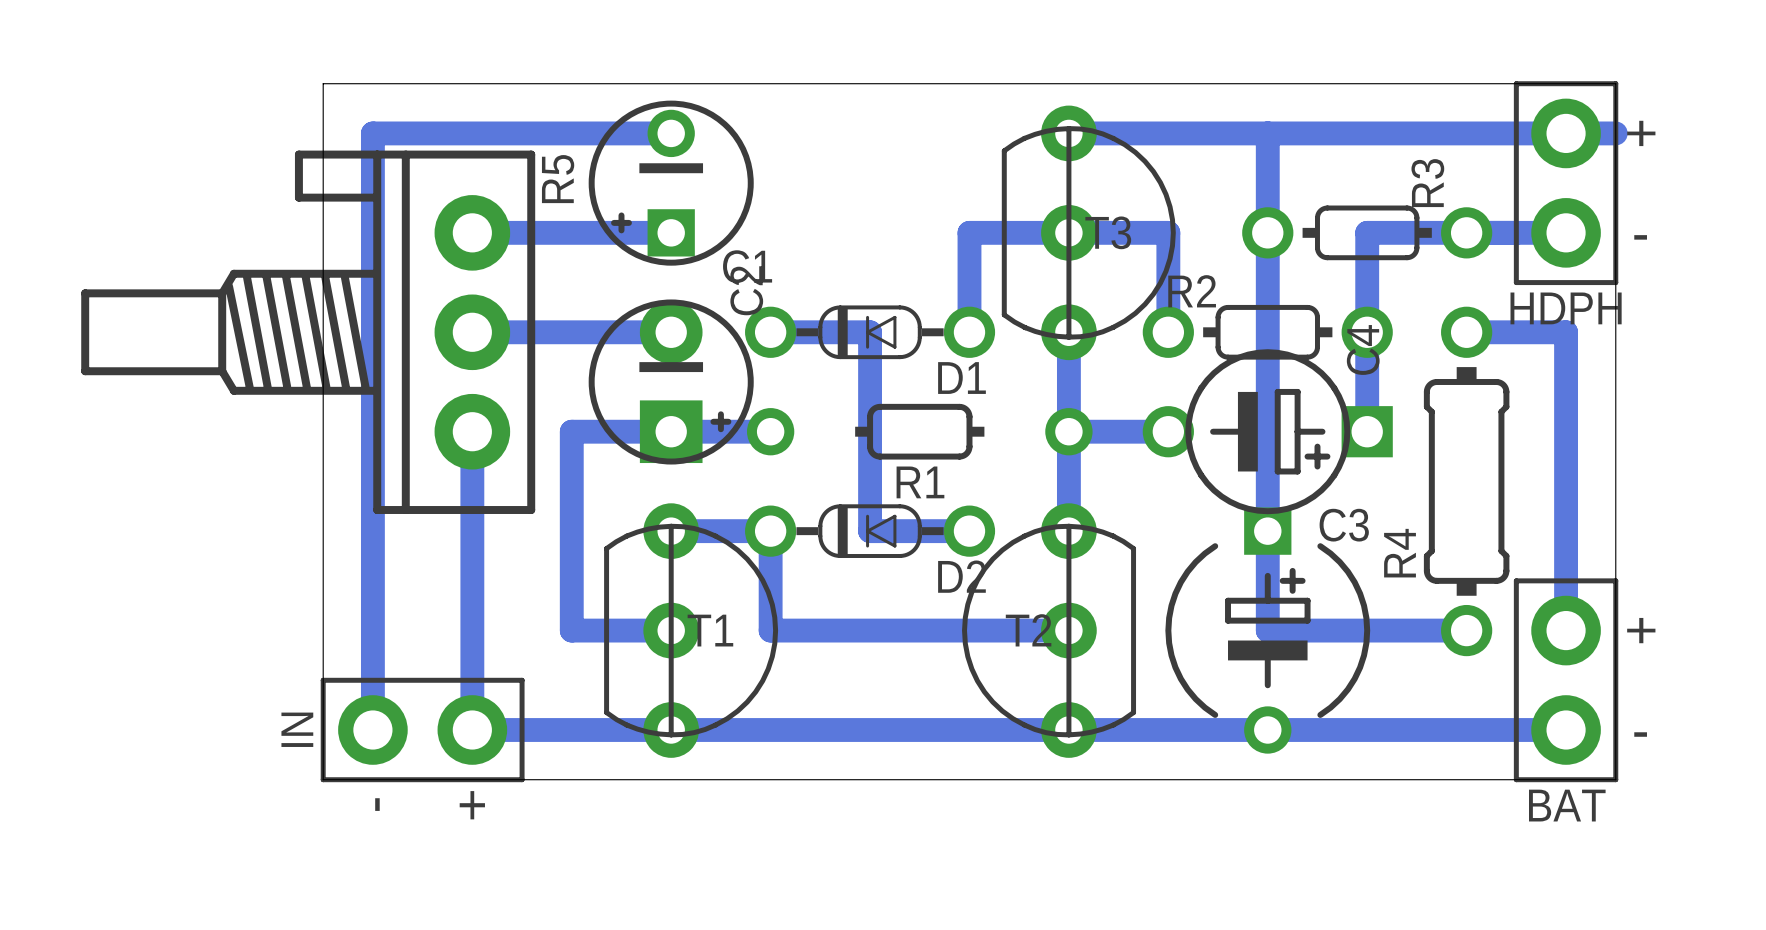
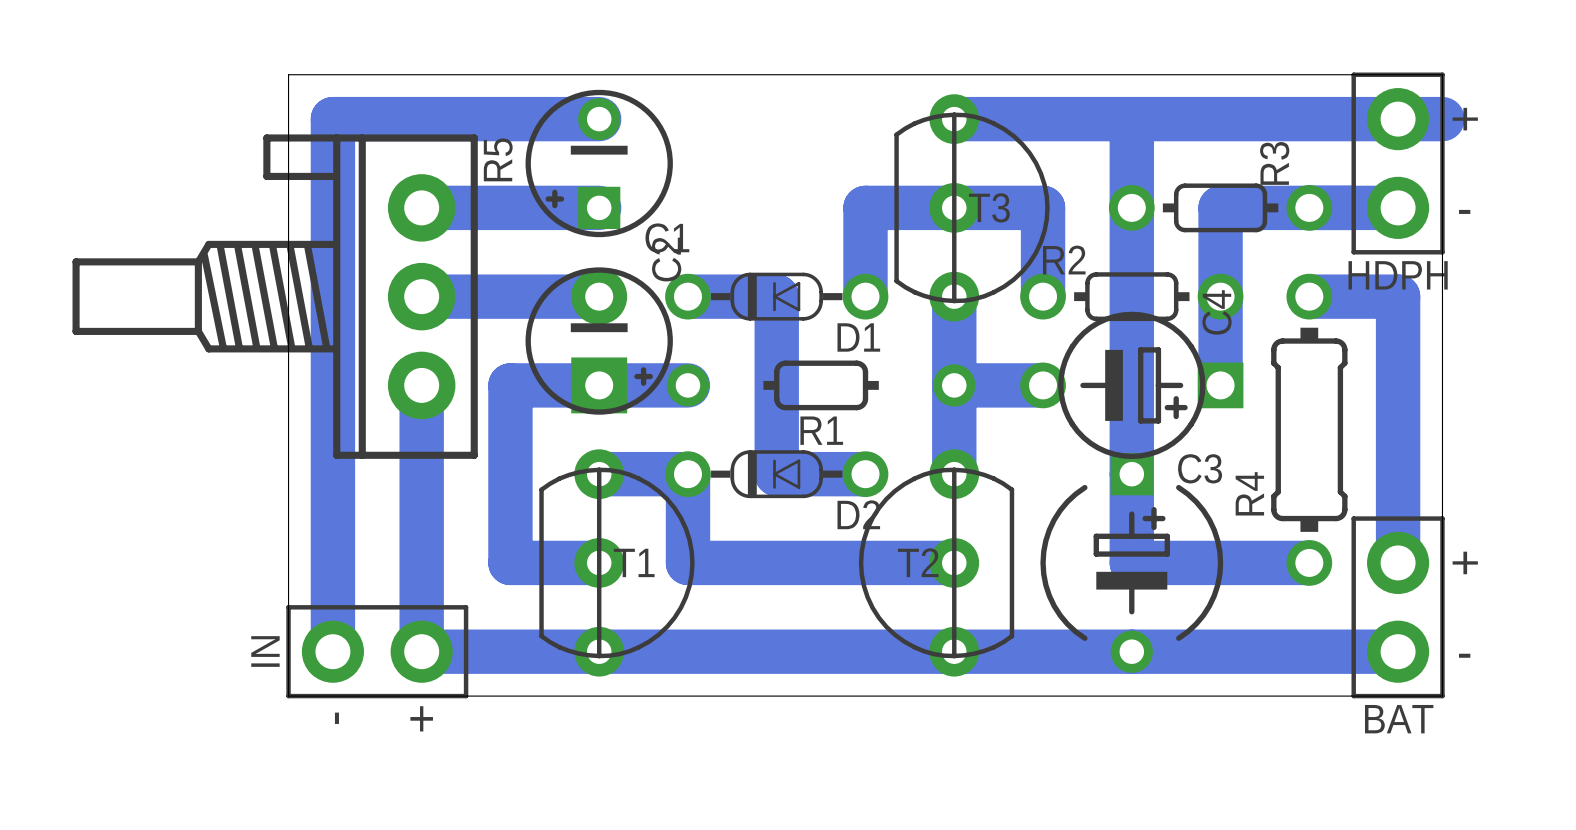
bottom track width: thin (671, 133) (372, 133) (372, 730) -> thick (599, 119) (332, 119) (332, 651)
bottom track width: thin (1068, 133) (1615, 133) -> thick (954, 119) (1442, 119)
bottom track width: thin (1267, 133) (1267, 630) (1466, 630) -> thick (1131, 119) (1131, 562) (1309, 562)
bottom track width: thin (472, 232) (671, 232) -> thick (421, 207) (599, 207)
bottom track width: thin (1566, 232) (1367, 232) (1367, 431) -> thick (1398, 207) (1220, 207) (1220, 385)
bottom track width: thin (472, 332) (671, 332) -> thick (421, 296) (599, 296)
bottom track width: thin (770, 332) (870, 332) (870, 531) (969, 531) -> thick (687, 296) (776, 296) (776, 474) (865, 474)
bottom track width: thin (969, 332) (969, 232) (1168, 232) (1168, 332) -> thick (865, 296) (865, 207) (1043, 207) (1043, 296)
bottom track width: thin (1068, 332) (1068, 531) -> thick (954, 296) (954, 474)
bottom track width: thin (1466, 332) (1566, 332) (1566, 630) -> thick (1309, 296) (1398, 296) (1398, 562)
bottom track width: thin (472, 431) (472, 730) (1566, 730) -> thick (421, 385) (421, 651) (1398, 651)
bottom track width: thin (770, 431) (571, 431) (571, 630) (671, 630) -> thick (687, 385) (510, 385) (510, 562) (599, 562)
bottom track width: thin (1068, 431) (1168, 431) -> thick (954, 385) (1043, 385)
bottom track width: thin (671, 531) (770, 531) (770, 630) (1068, 630) -> thick (599, 474) (687, 474) (687, 562) (954, 562)

